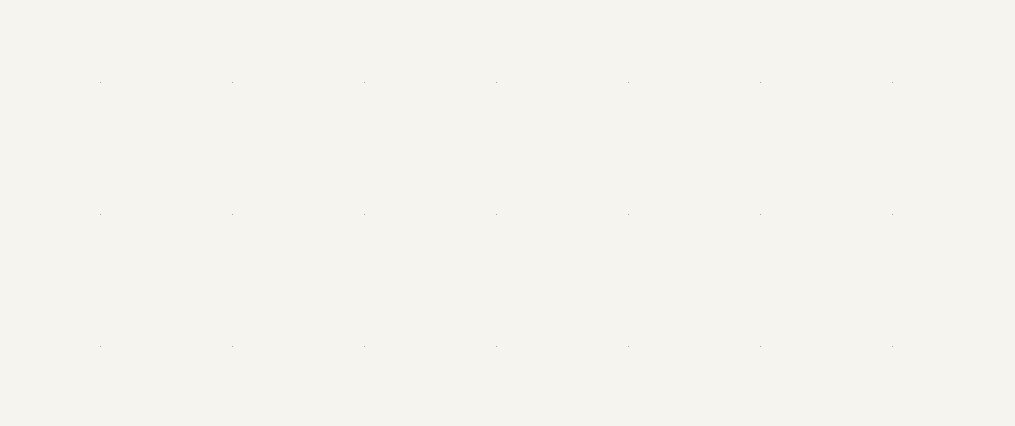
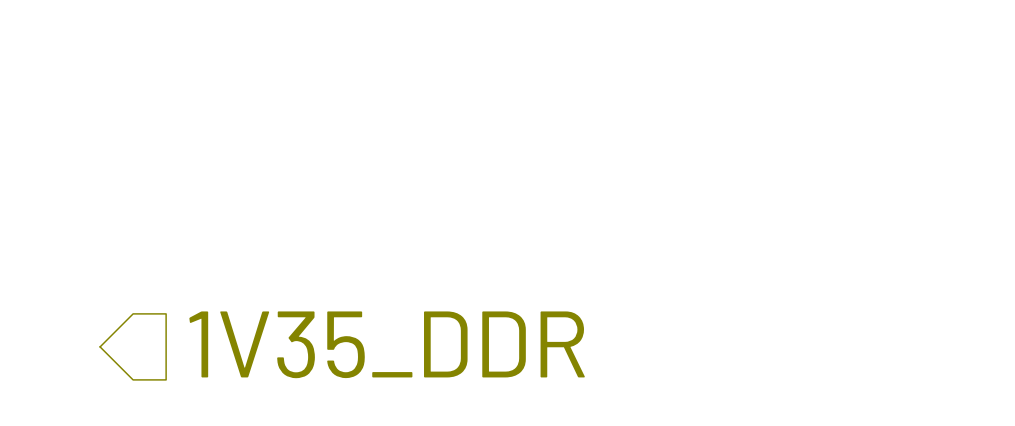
hierarchical label: none -> 1V35_DDR (387, 344)

